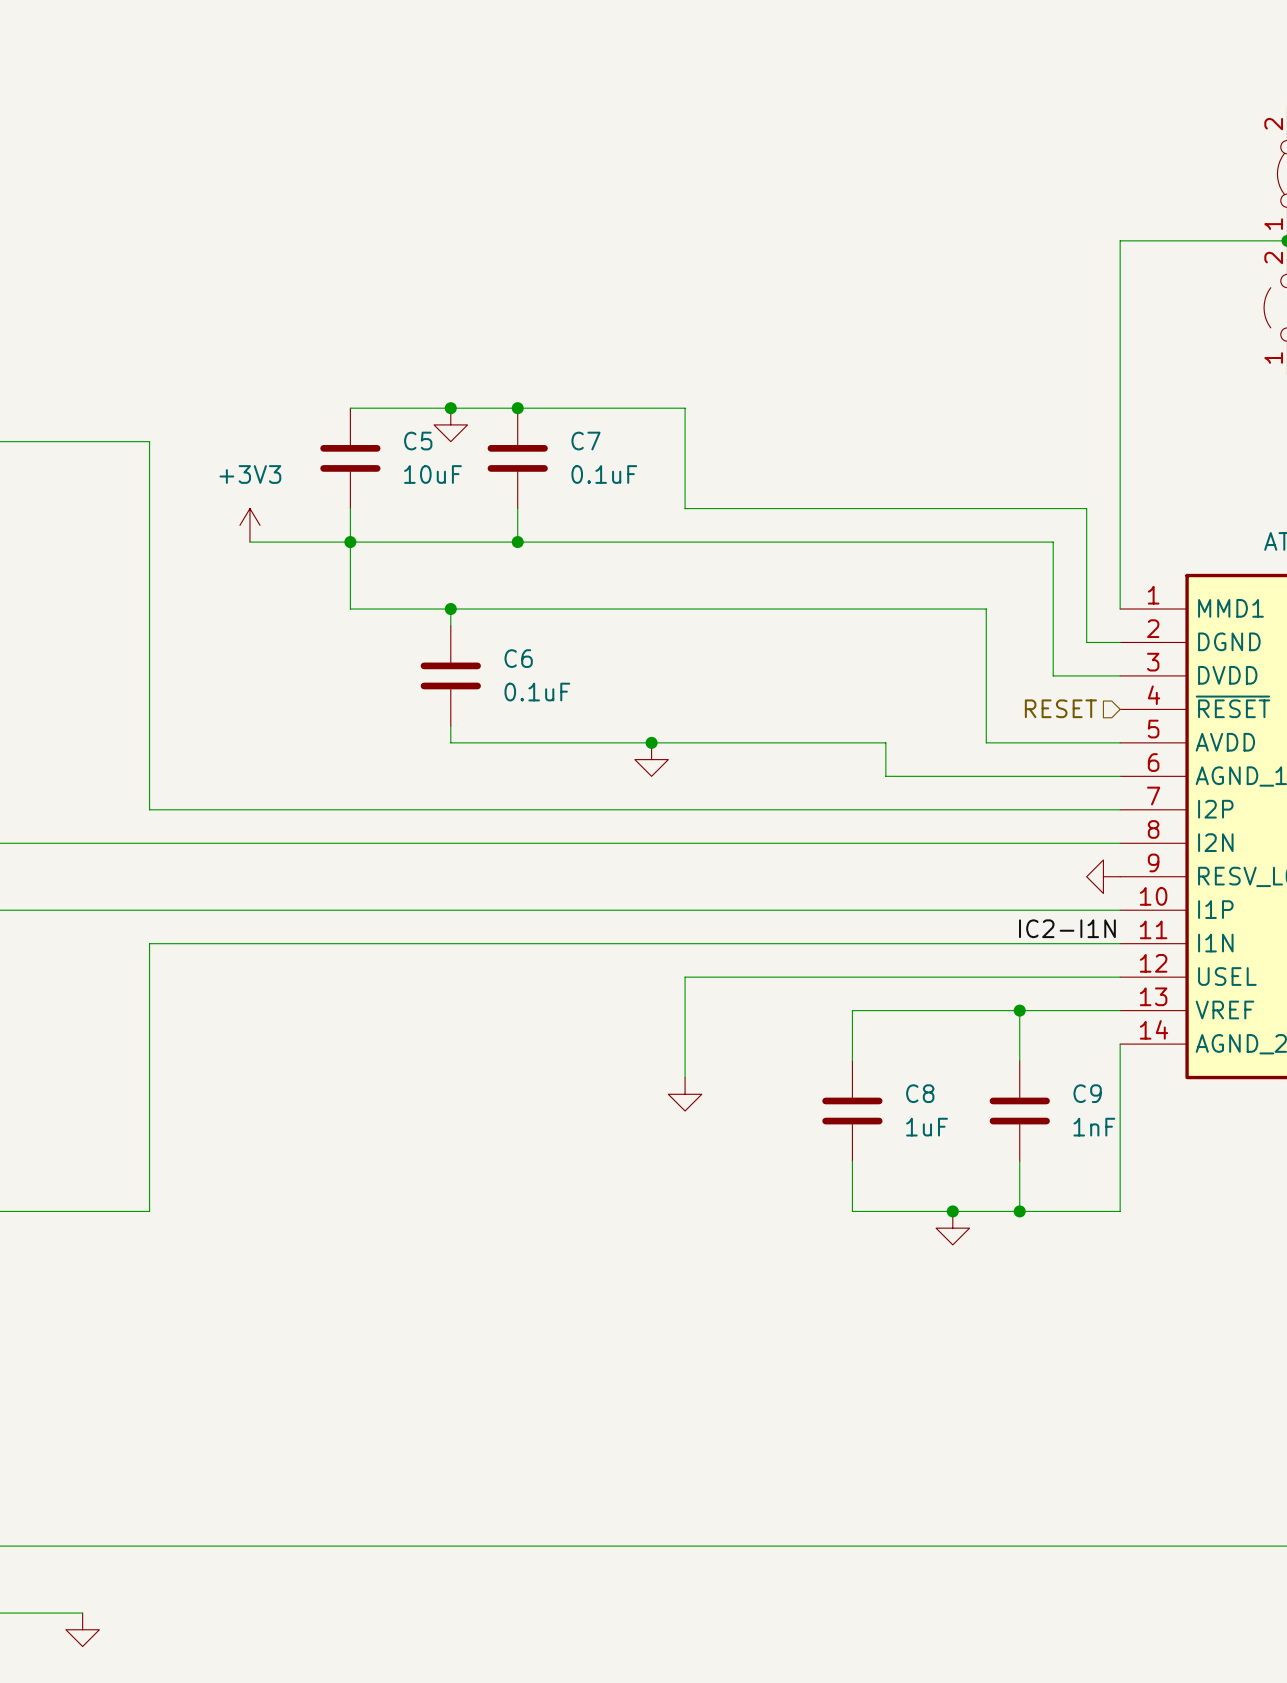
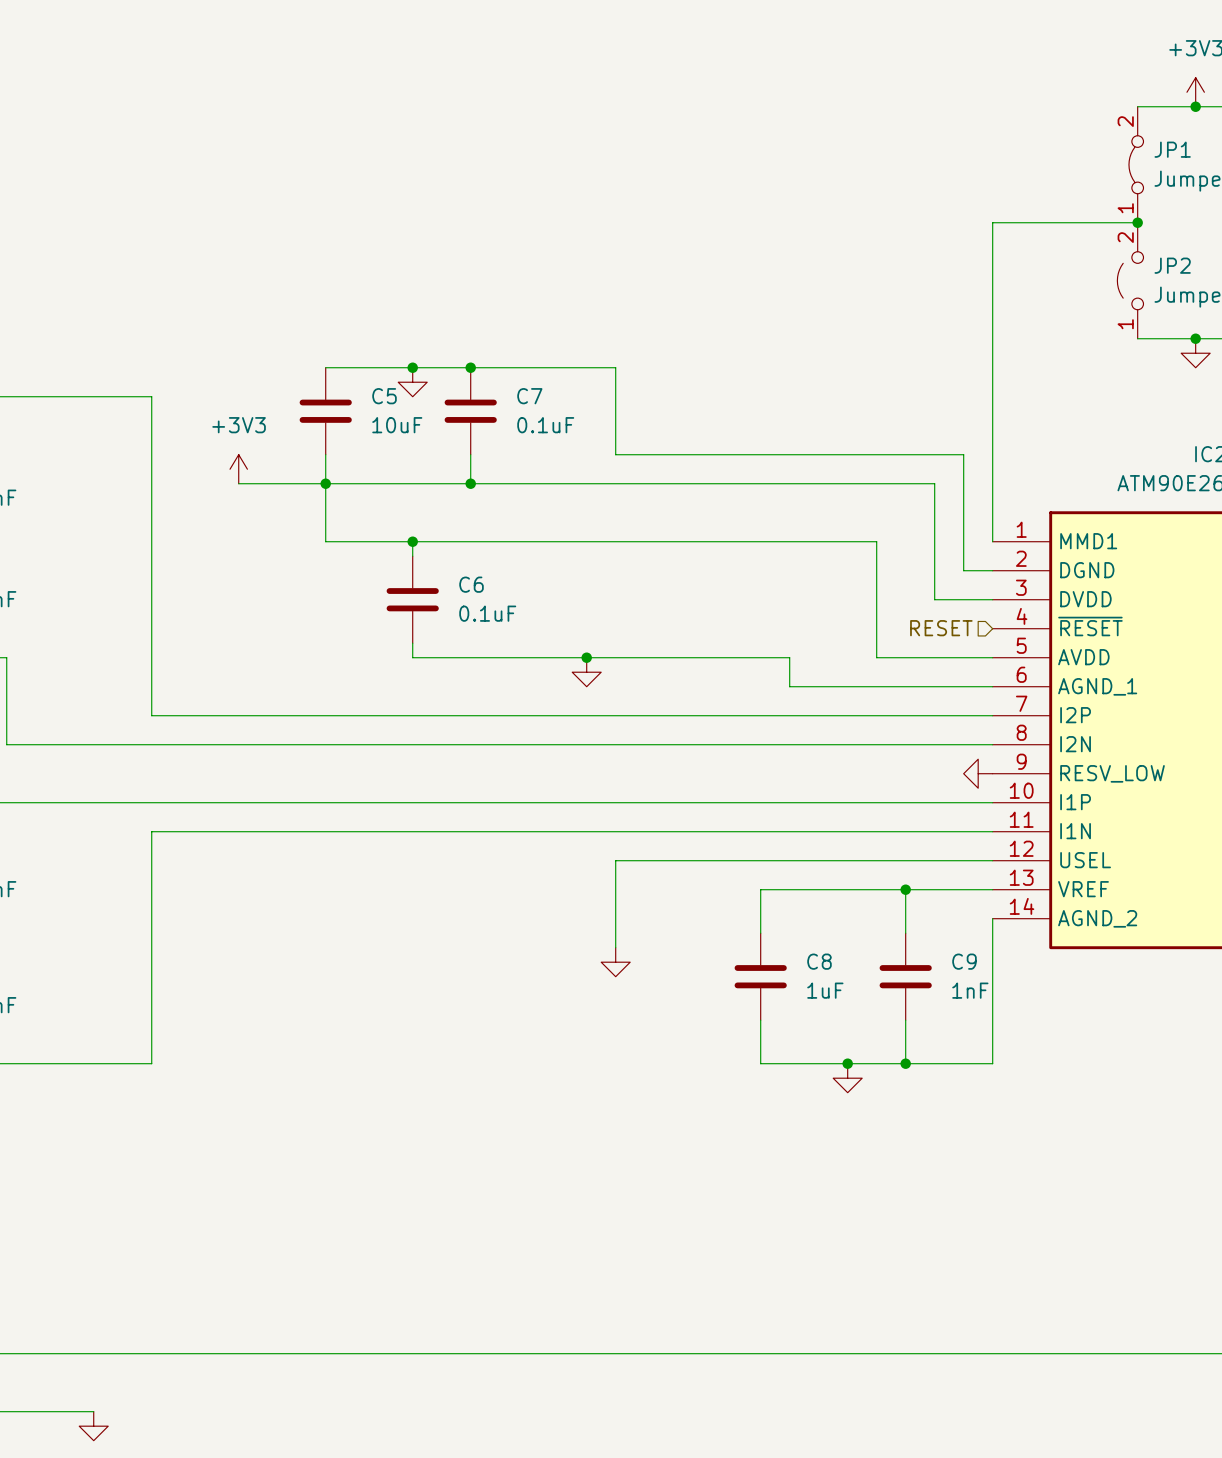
label: IC2-I1N (1067, 928) -> none

